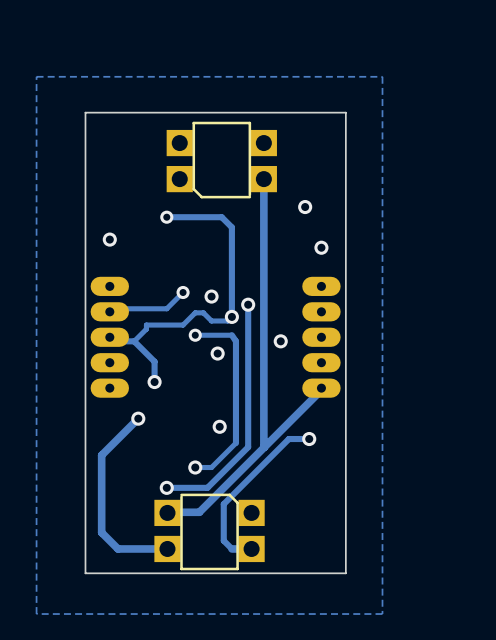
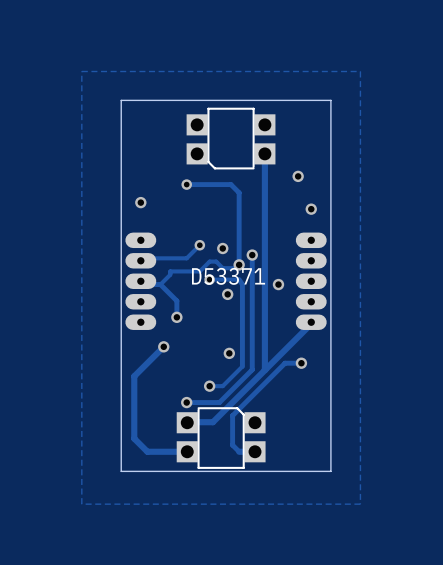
text: none -> D53371 (228, 276)

